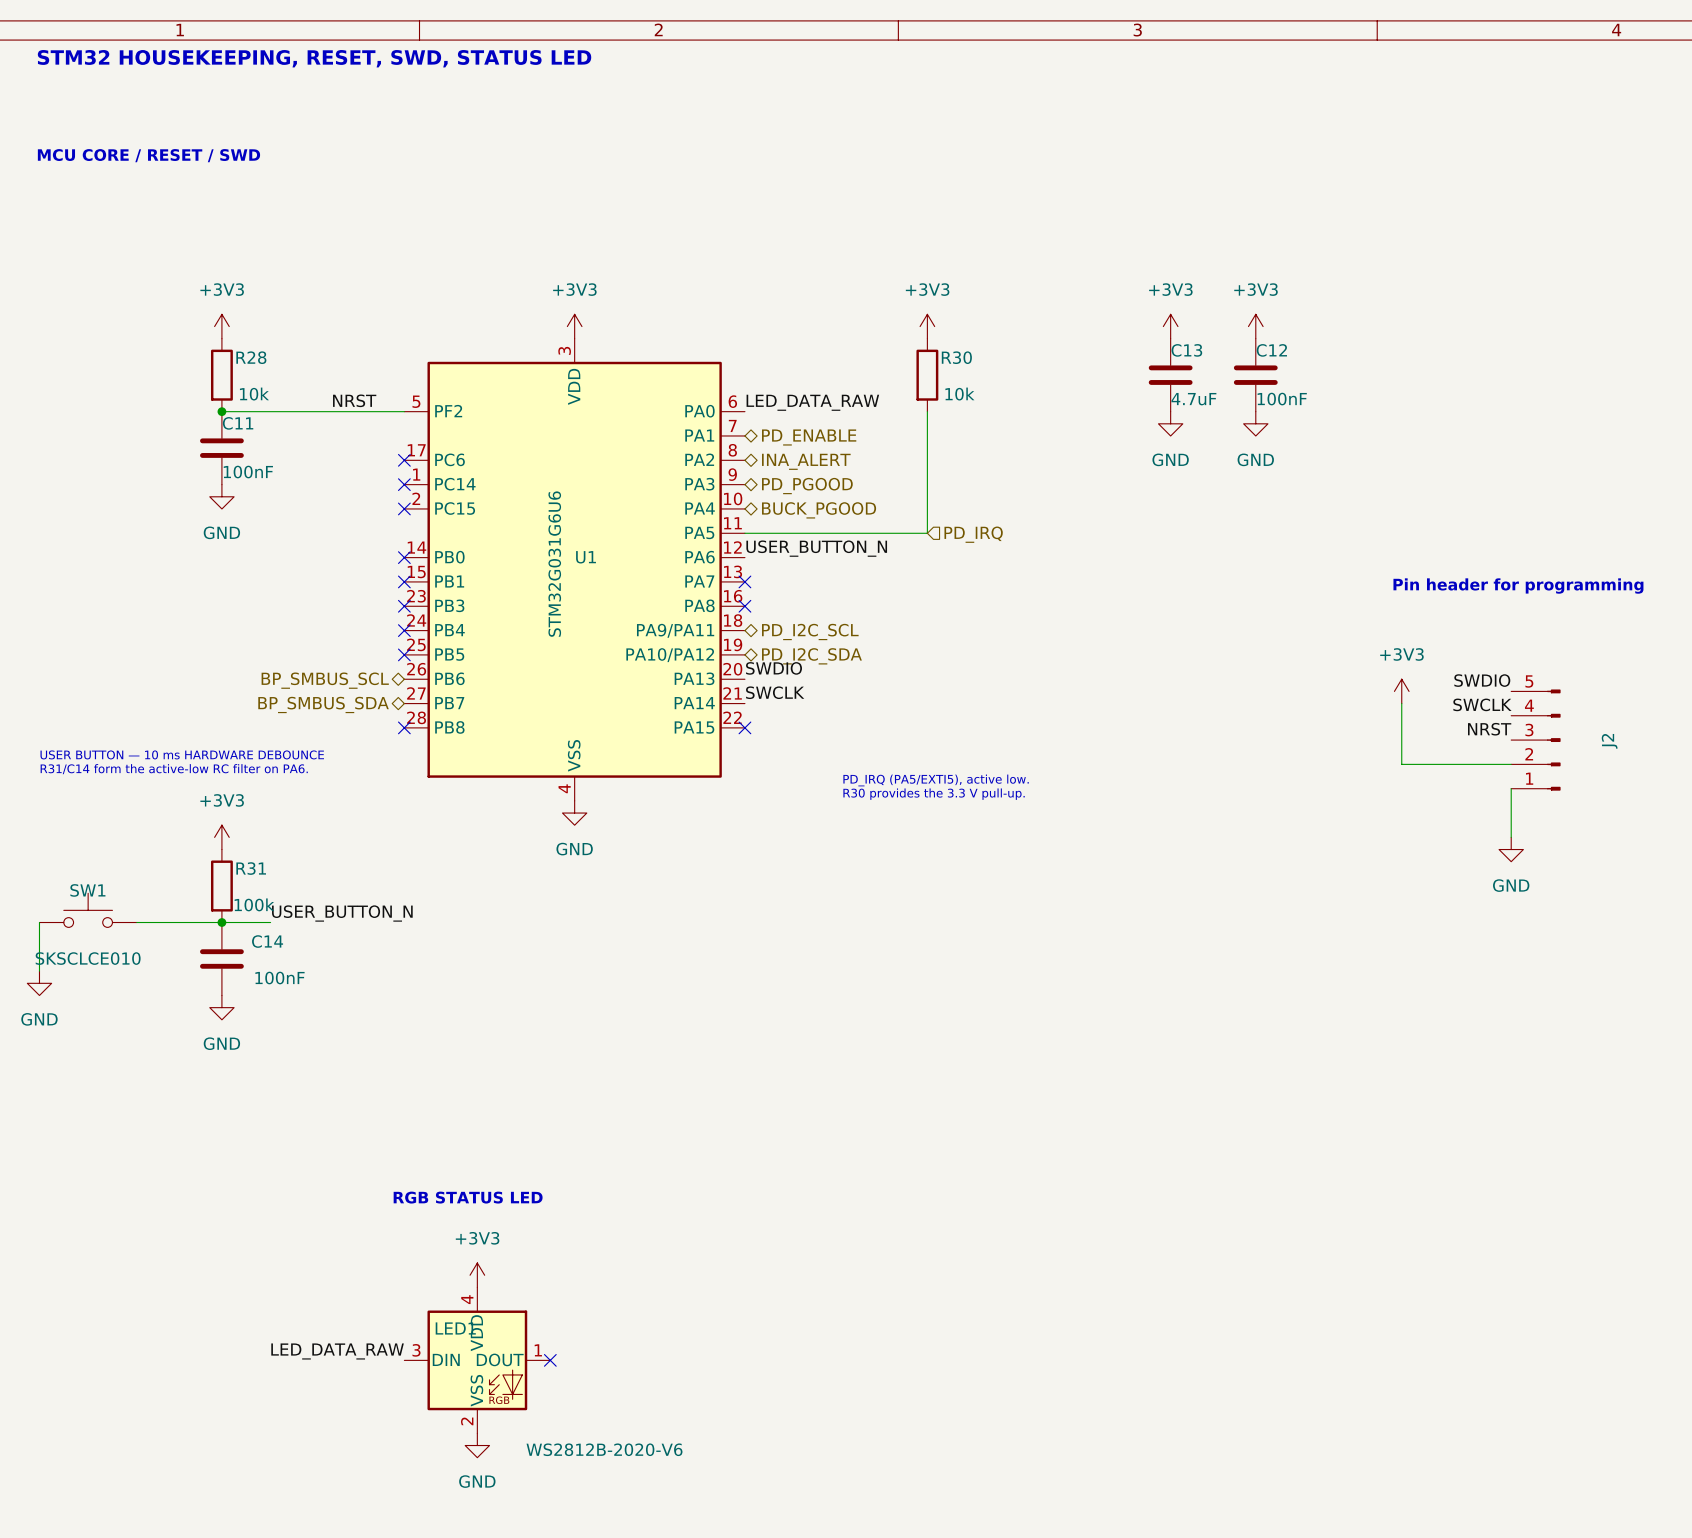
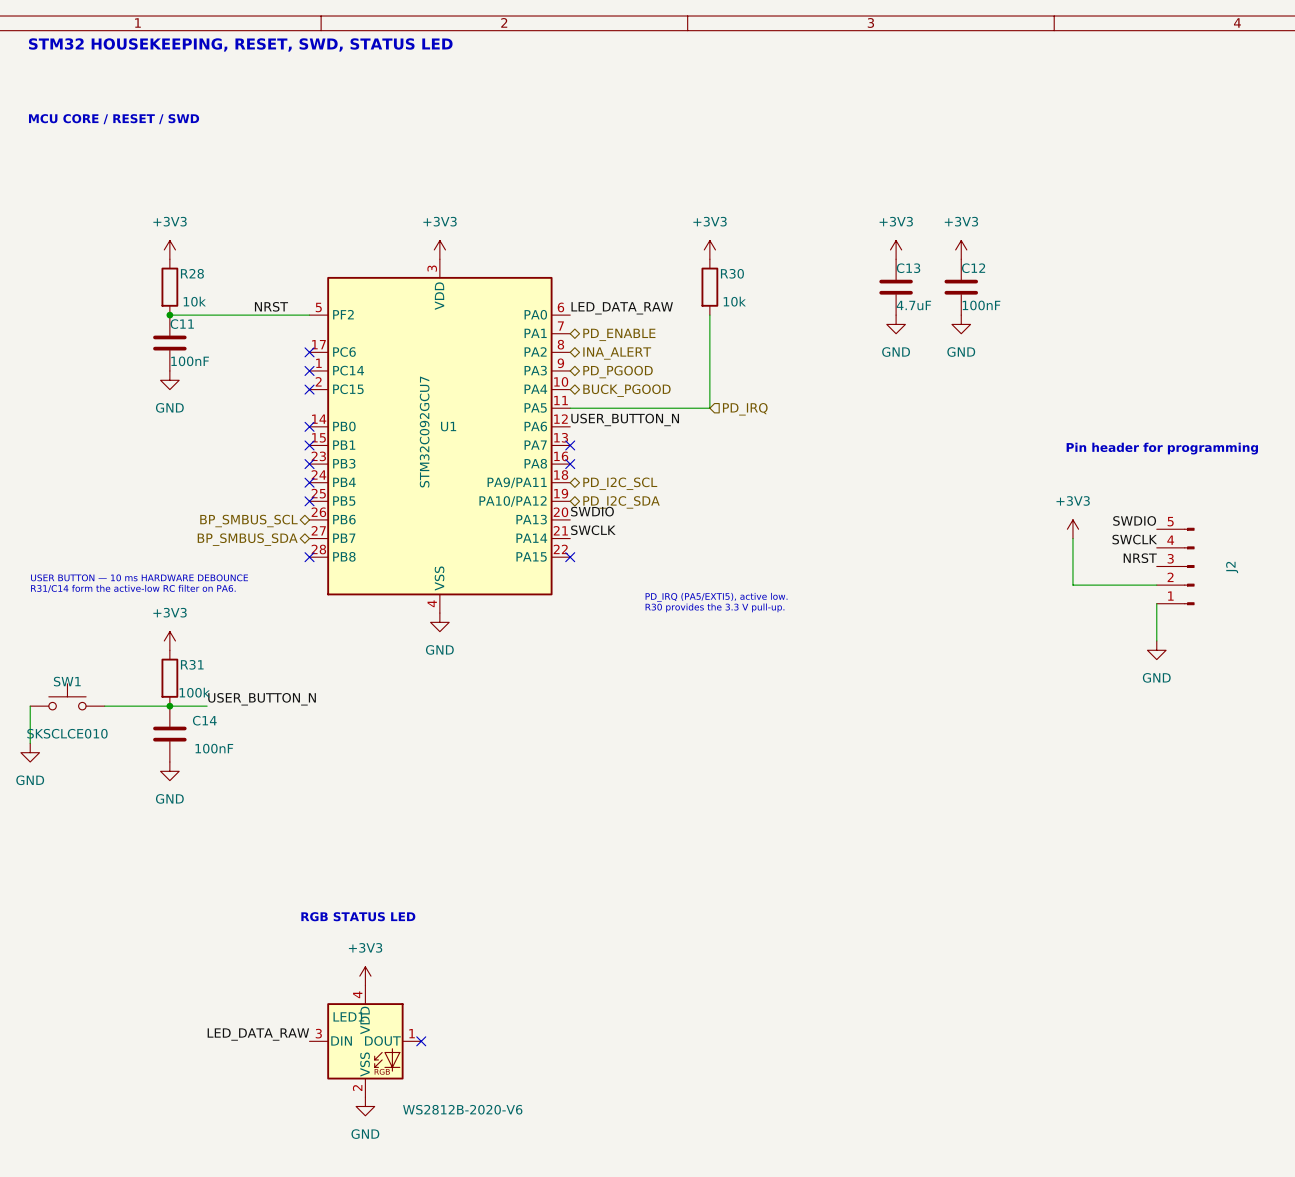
U1 value: STM32G031G6U6 (554, 564) -> STM32C092GCU7 (424, 432)

